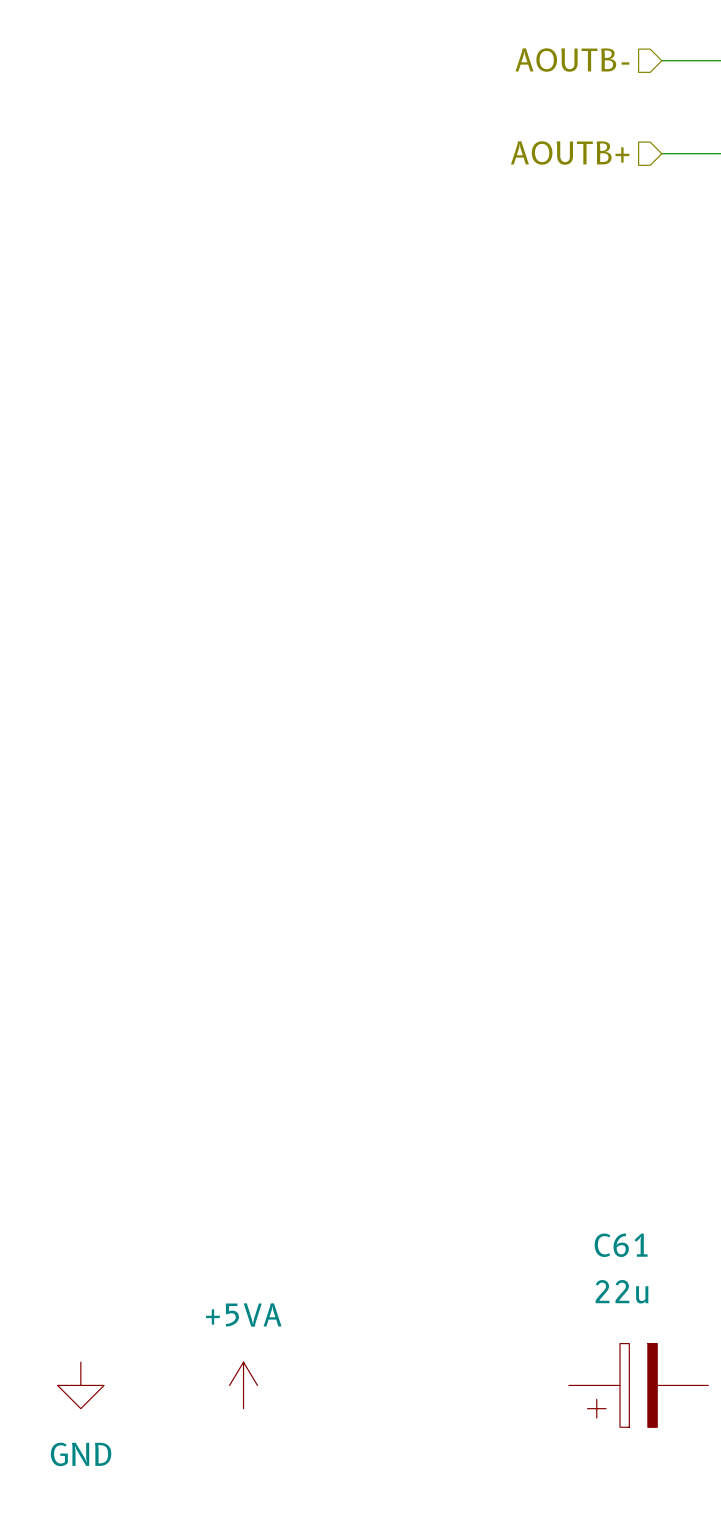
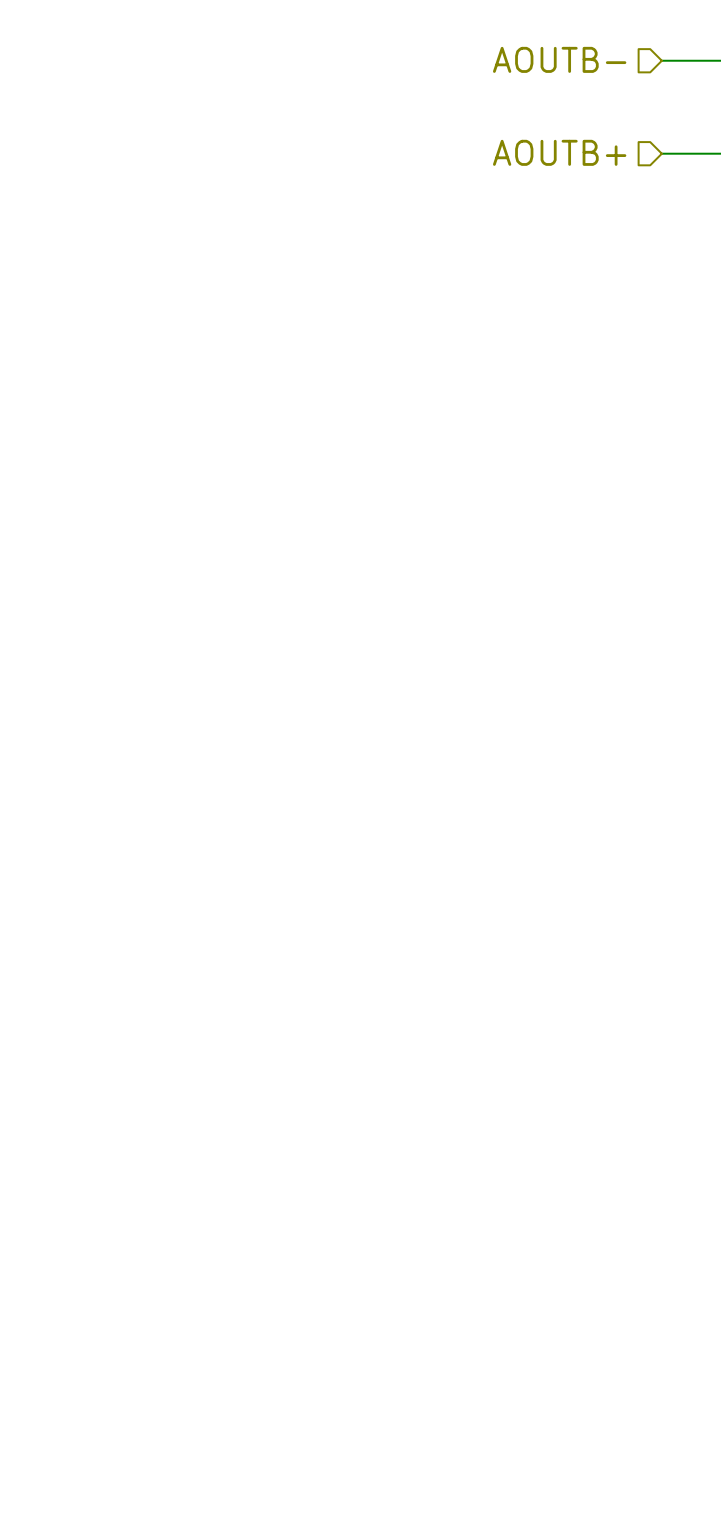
power symbol: GND (80, 1385) -> none
power symbol: +5VA (243, 1385) -> none
C61: 22u (638, 1385) -> none

